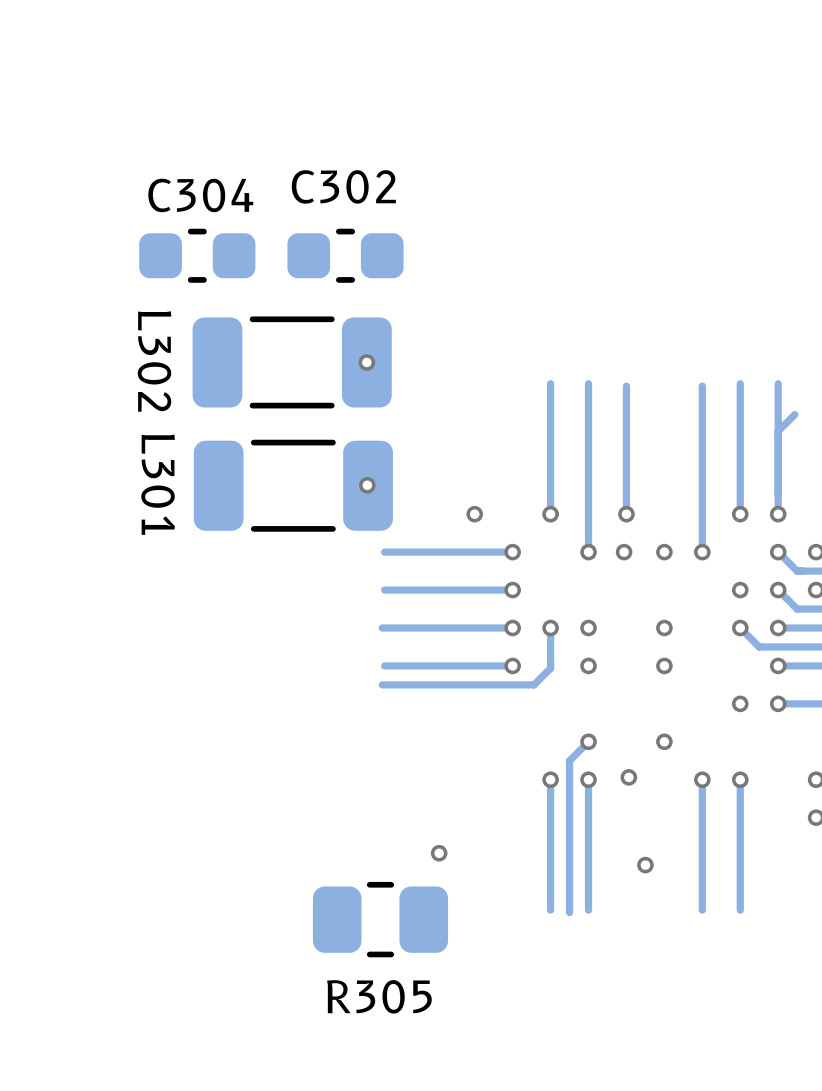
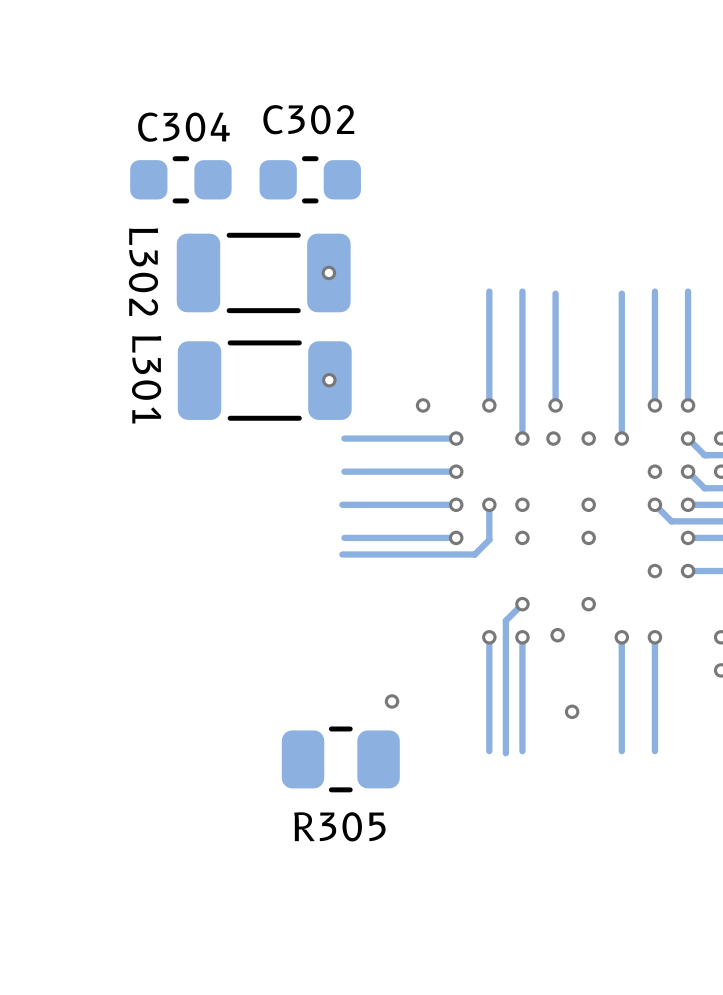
track: (794, 414) (778, 431) -> none

